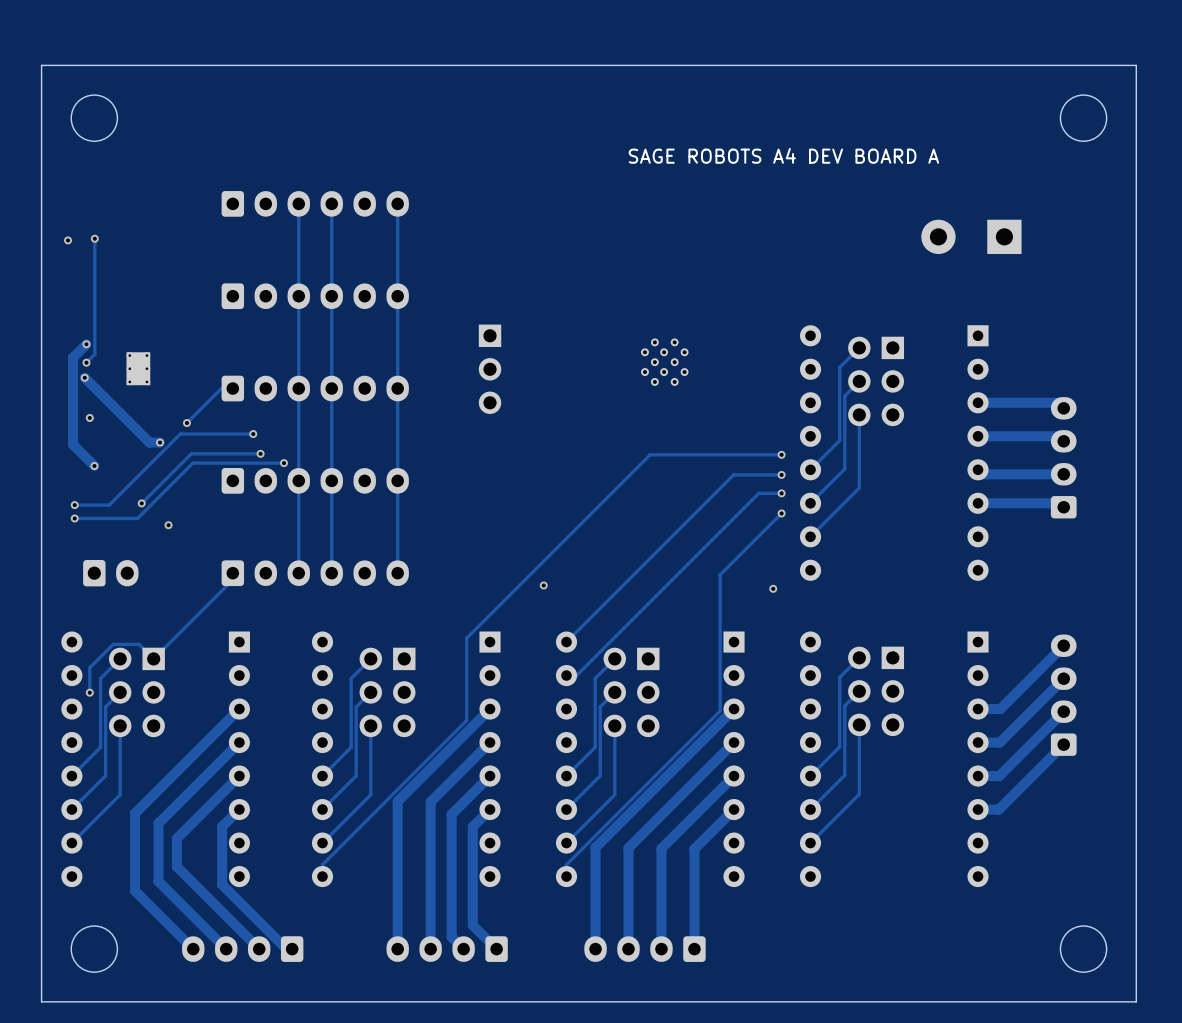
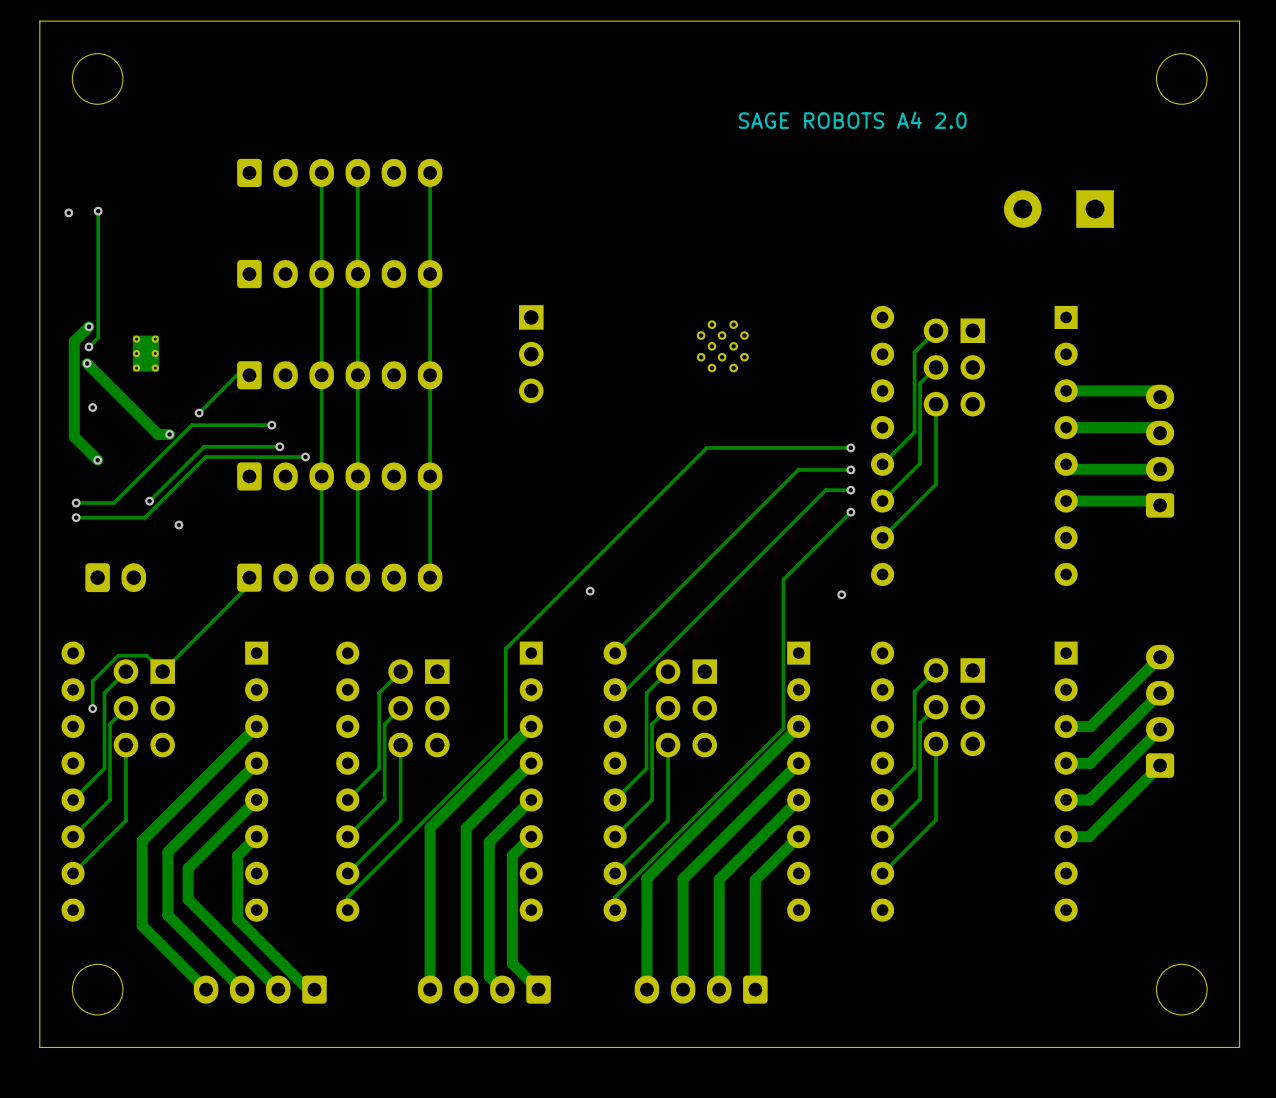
text: SAGE ROBOTS A4 DEV BOARD A (783, 155) -> SAGE ROBOTS A4 2.0 (852, 120)

